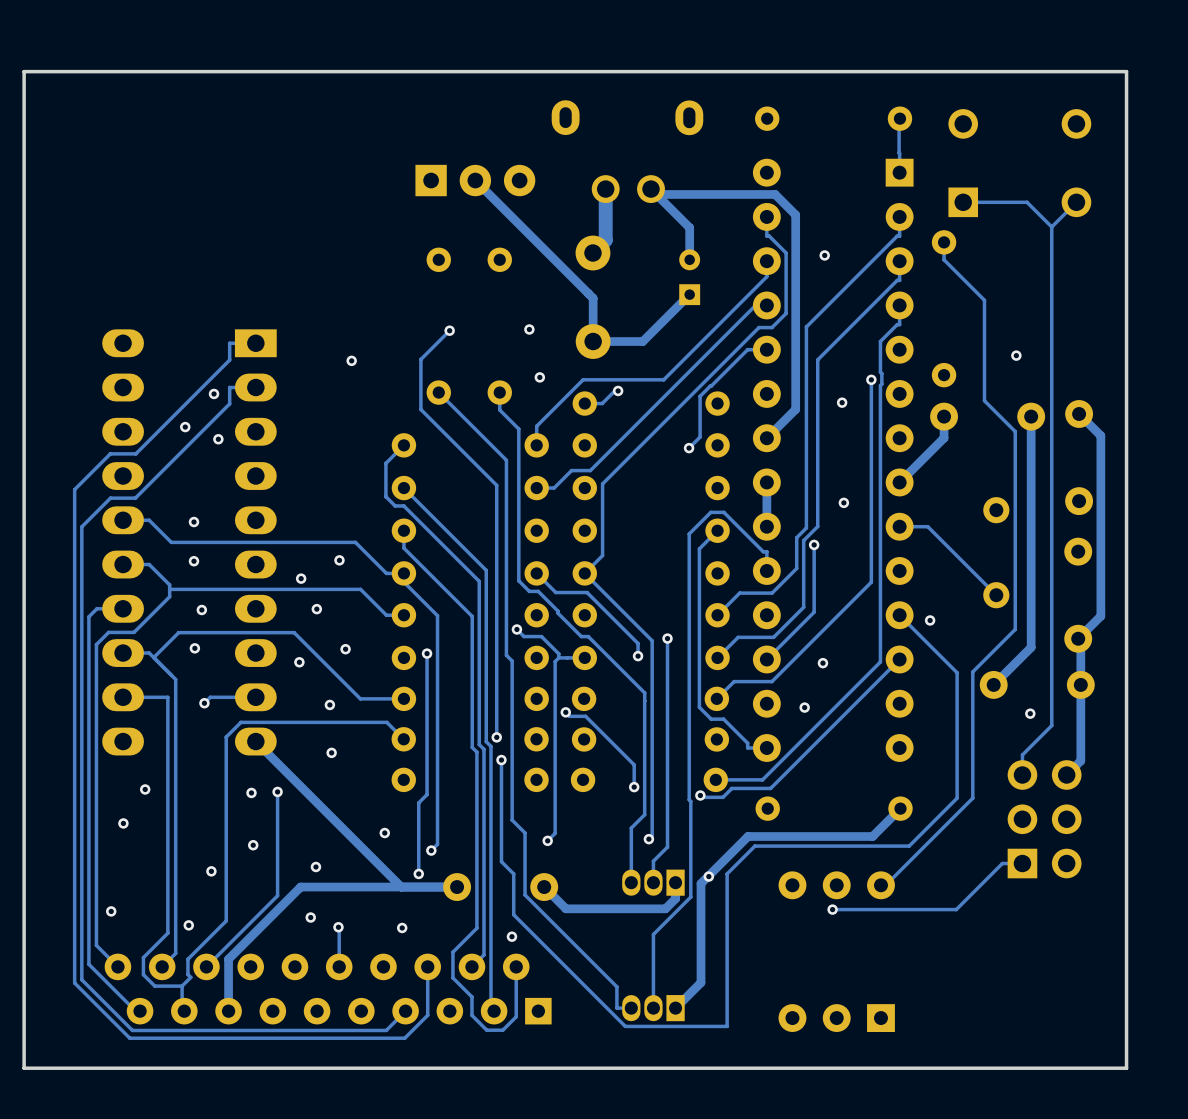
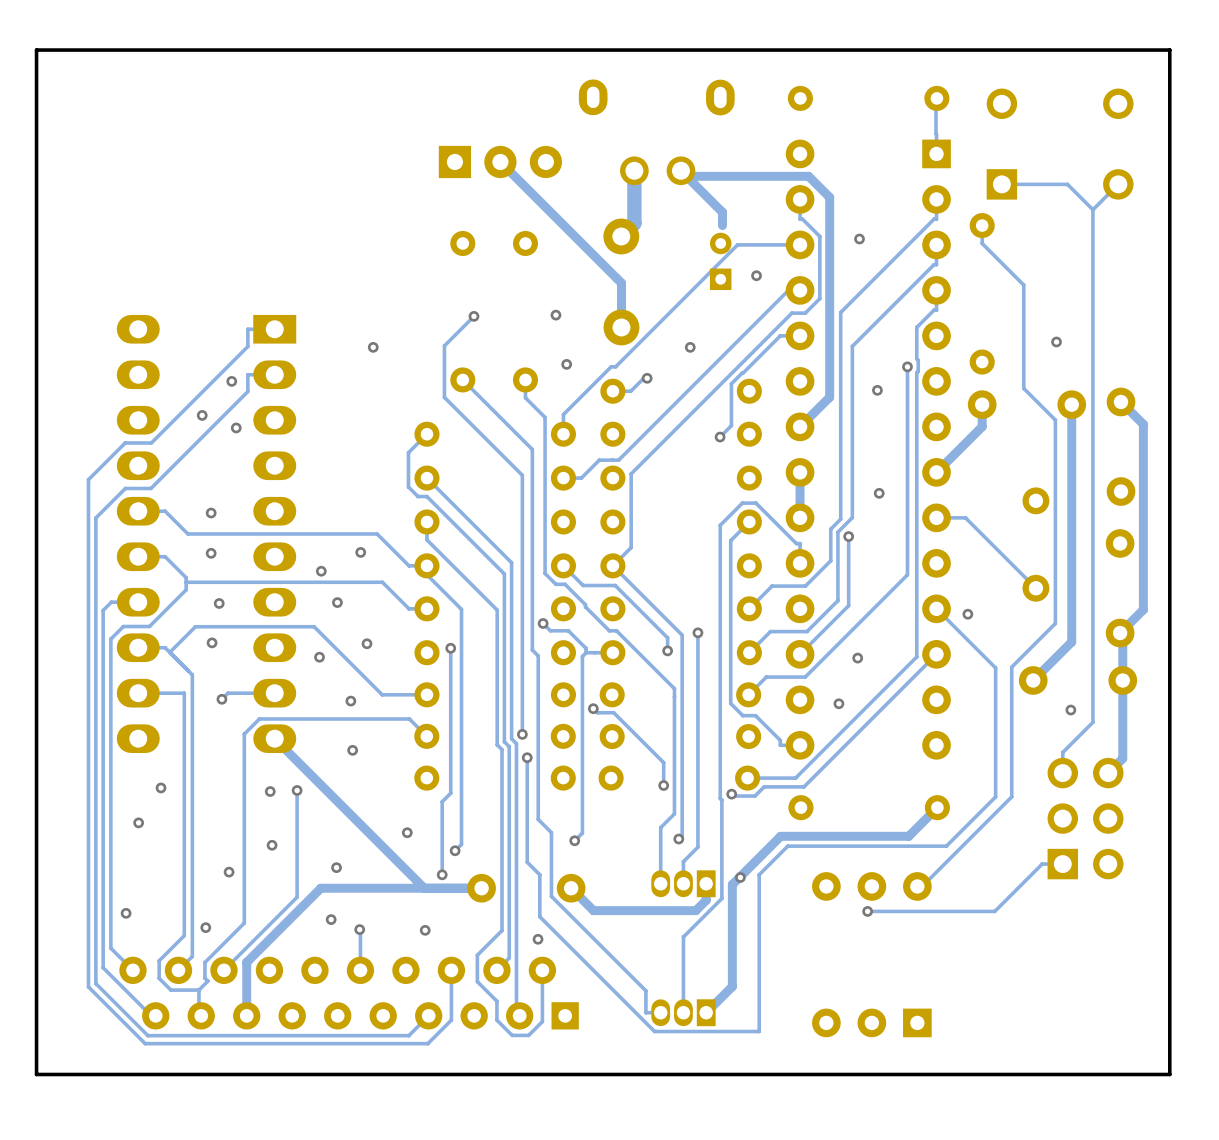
track: (689, 227) (689, 259) -> (720, 210) (722, 212) (722, 225)
track: (766, 261) (766, 276) (663, 379) (587, 379) -> (800, 244) (737, 244) (615, 366)
via: none -> (756, 275)
track: (689, 294) (642, 341) (593, 341) -> none
via: none -> (690, 347)

